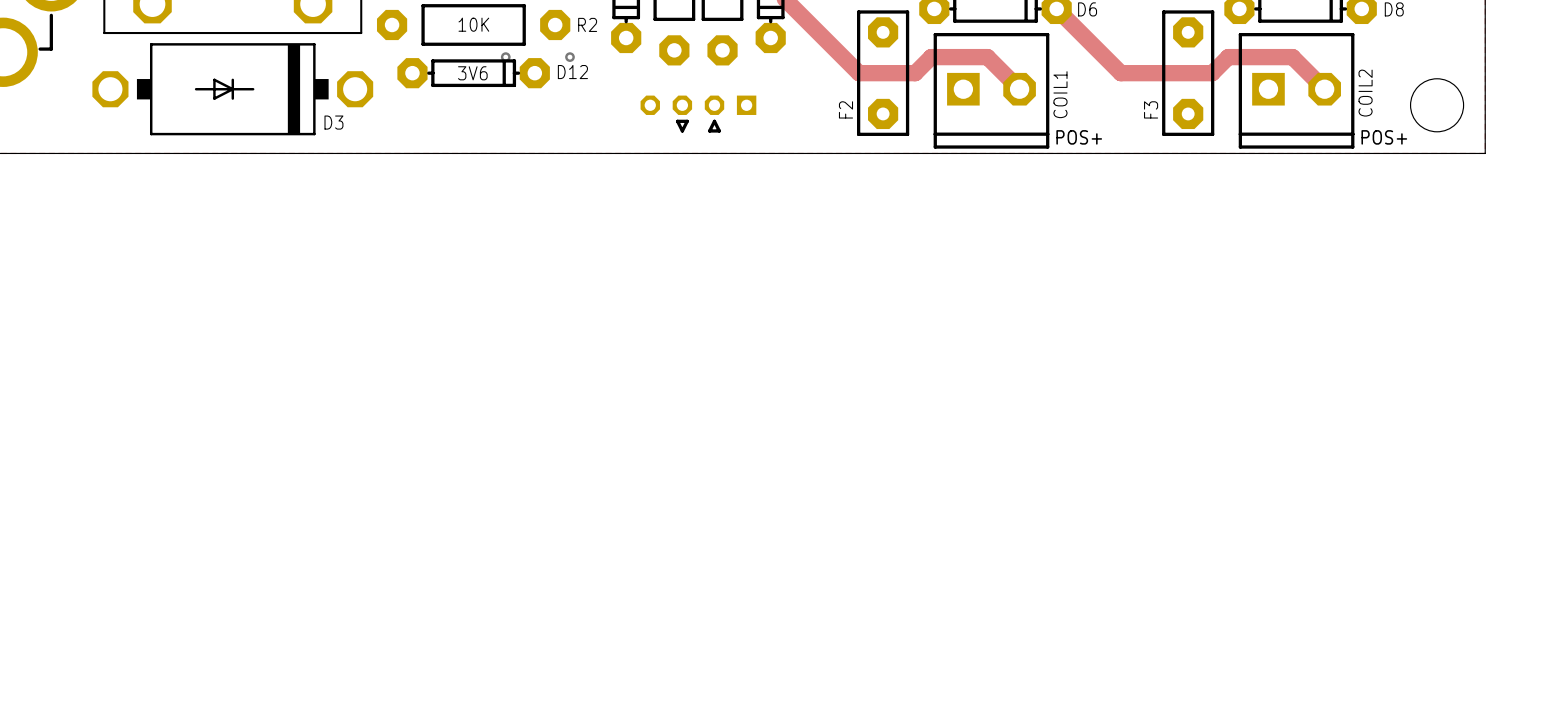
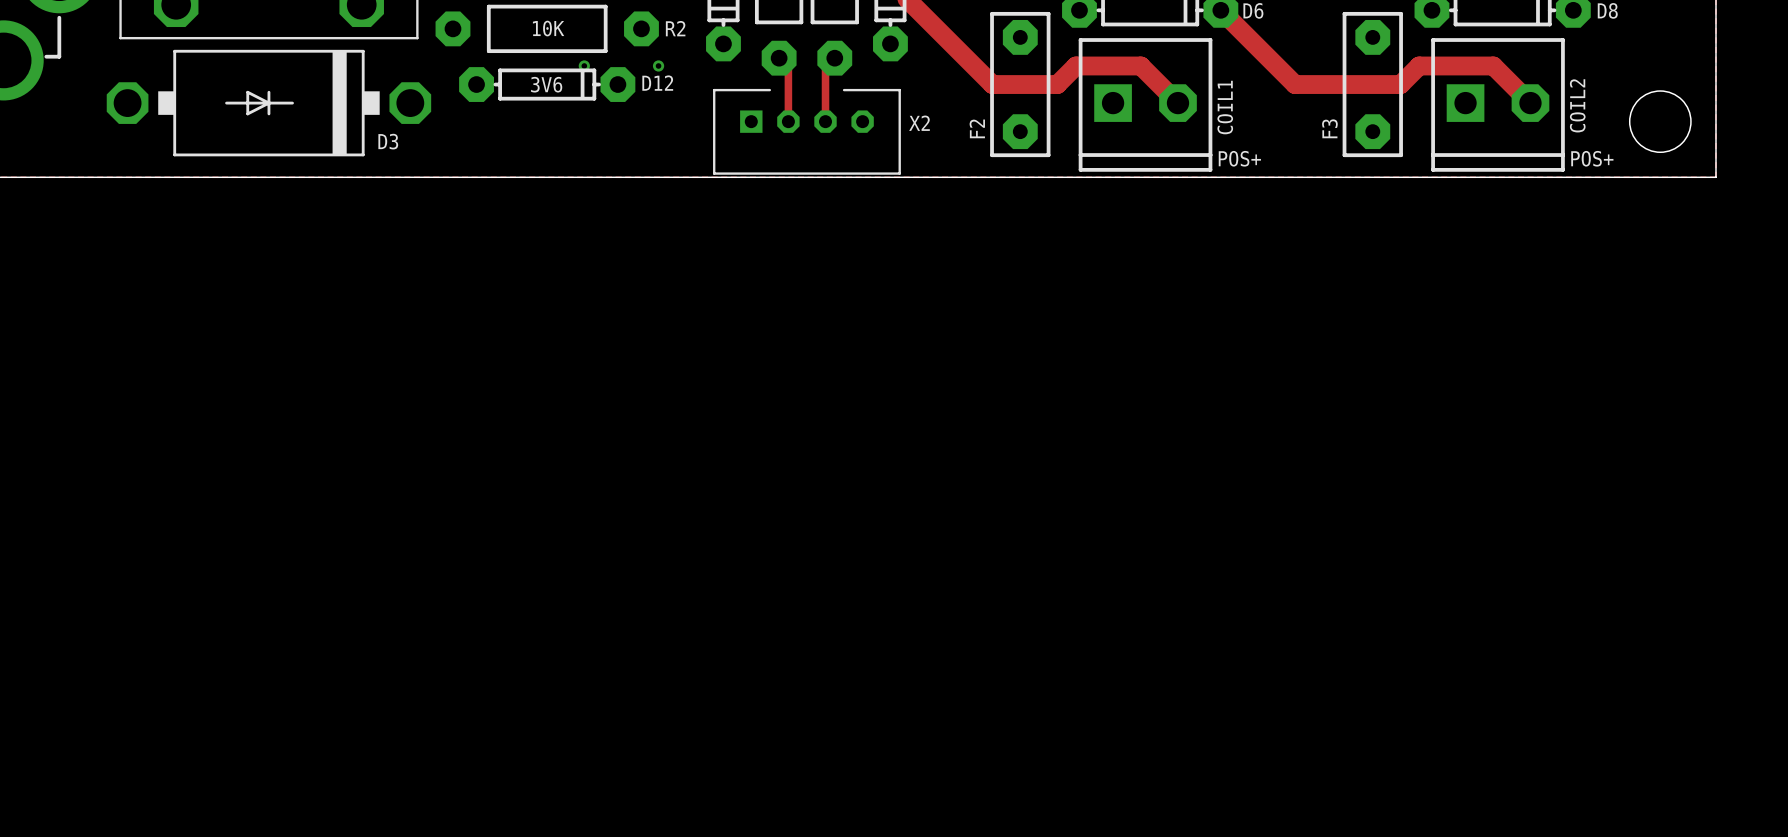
track: none -> (779, 58) (788, 67) (788, 121)
track: none -> (834, 58) (825, 67) (825, 121)
X2 side: bottom (698, 105) -> top (806, 131)
line: (677, 121) (687, 121) (682, 130) (677, 121) -> none
line: (714, 121) (709, 130) (719, 130) (714, 121) -> none

